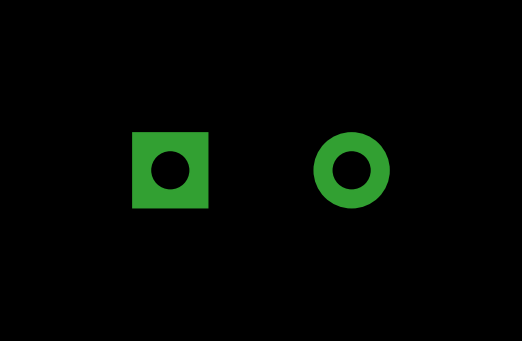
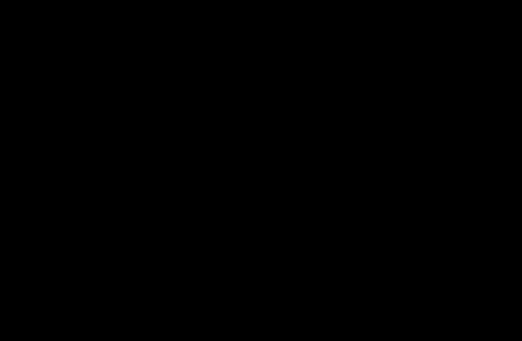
part: (260, 170) -> none

